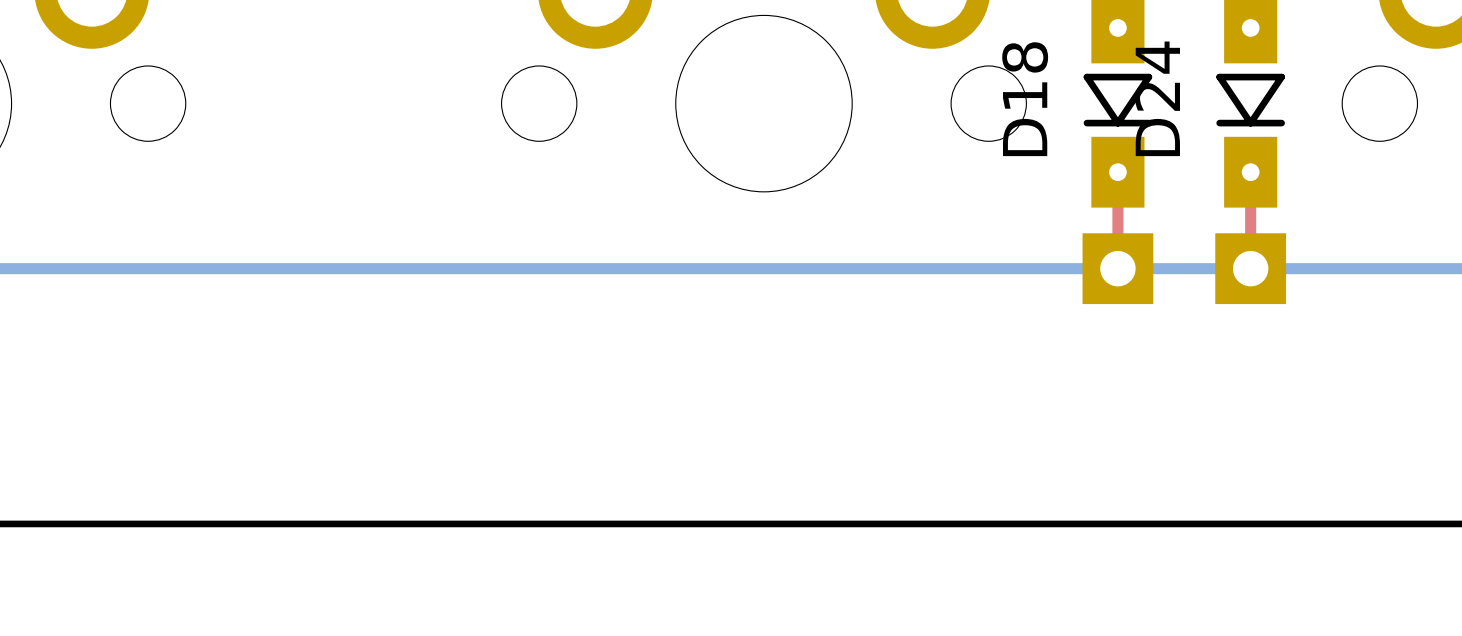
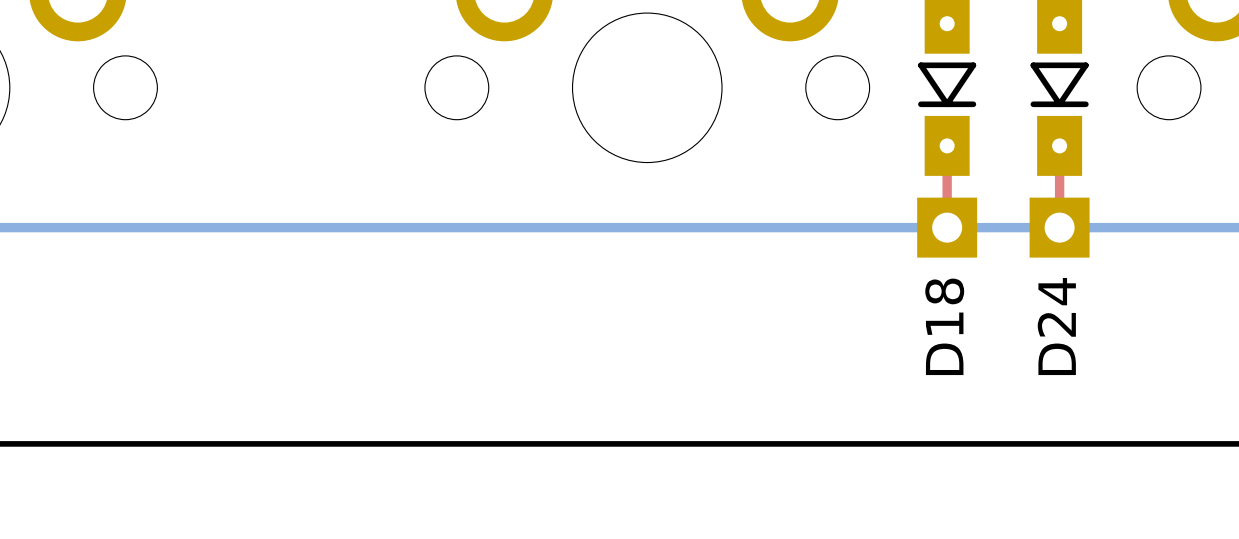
D24 name position: D24 (1157, 98) -> D24 (1056, 326)
D18 name position: D18 (1025, 99) -> D18 (944, 326)

